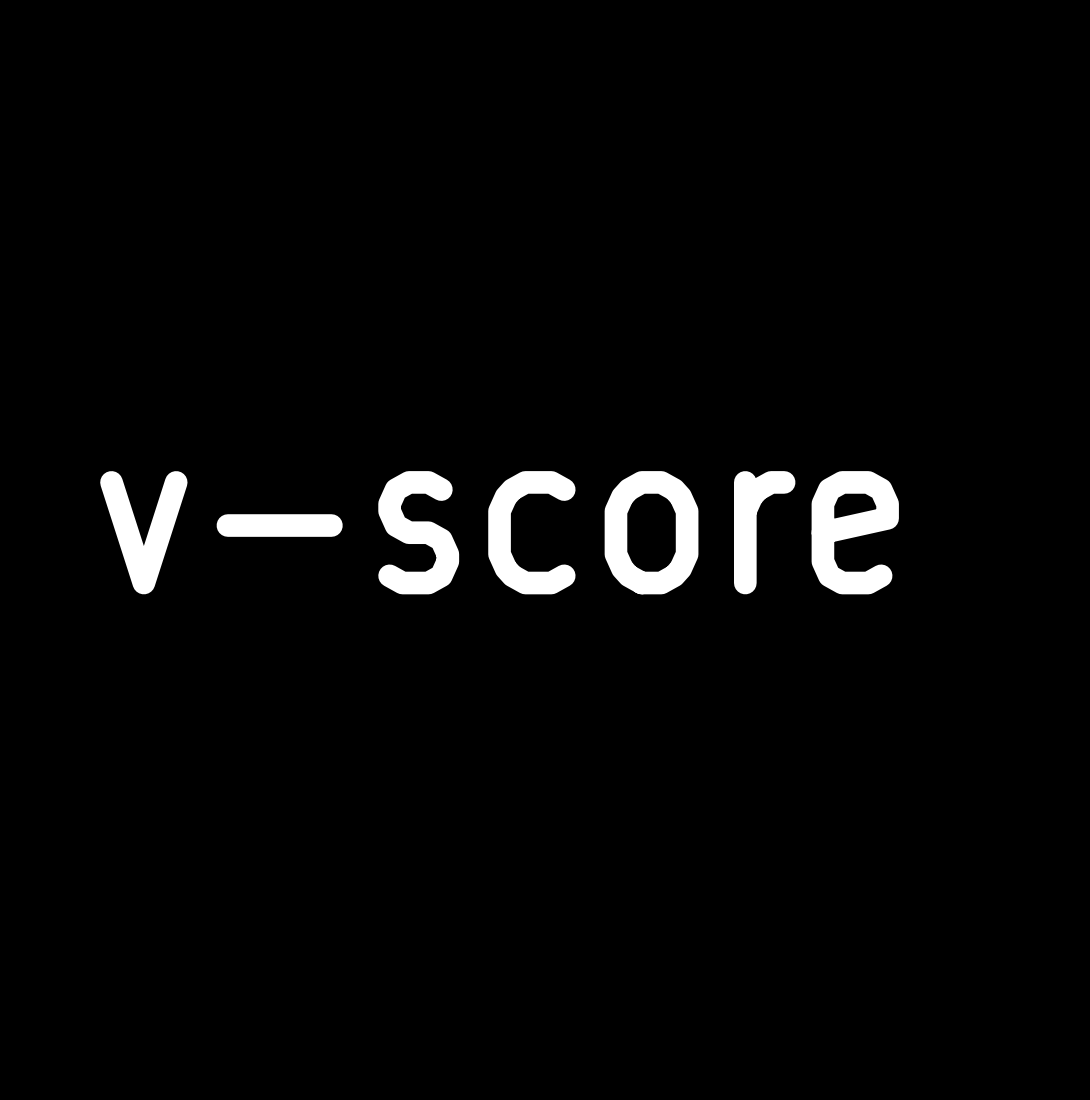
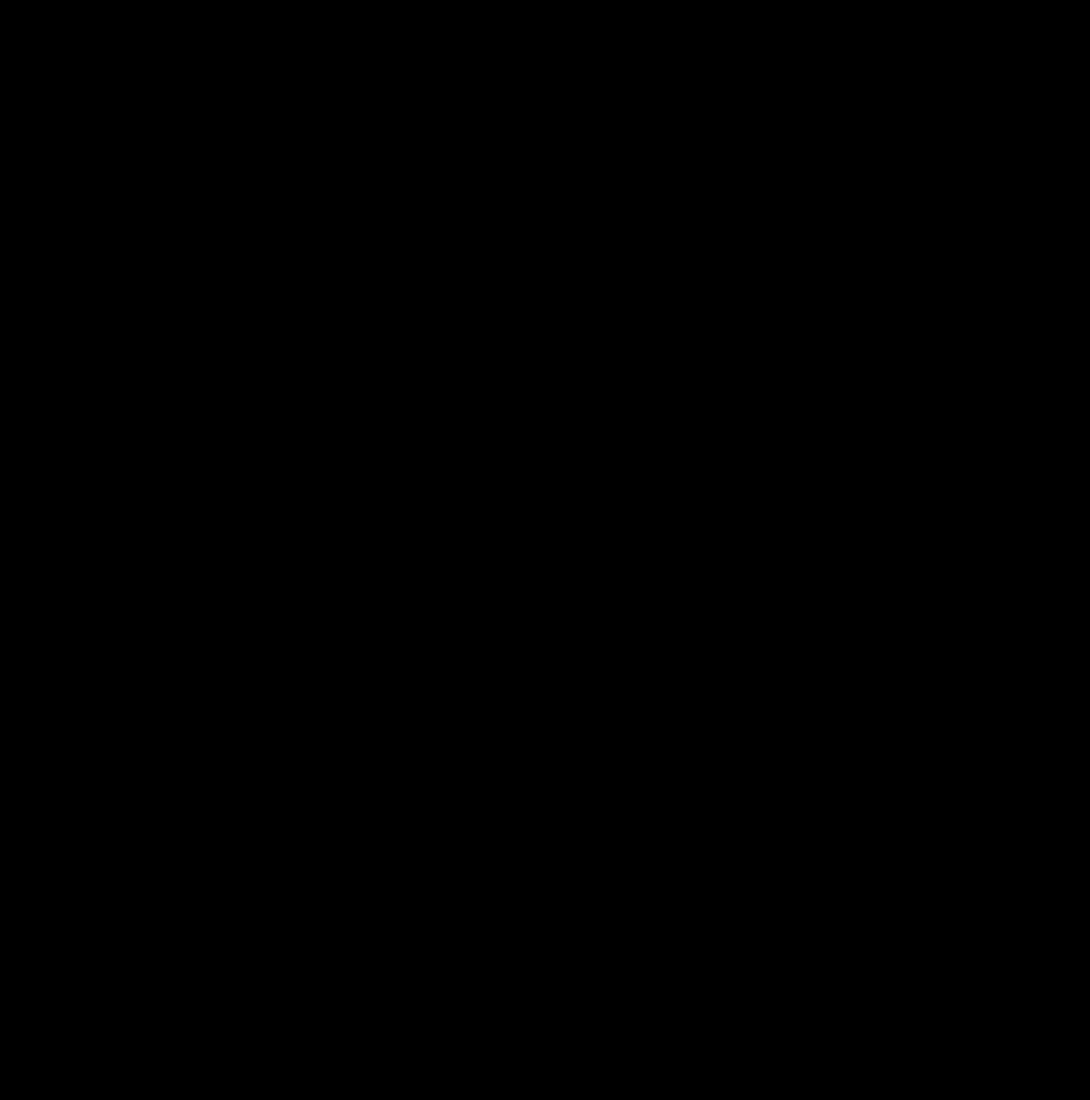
text: v-score (499, 532) -> none

